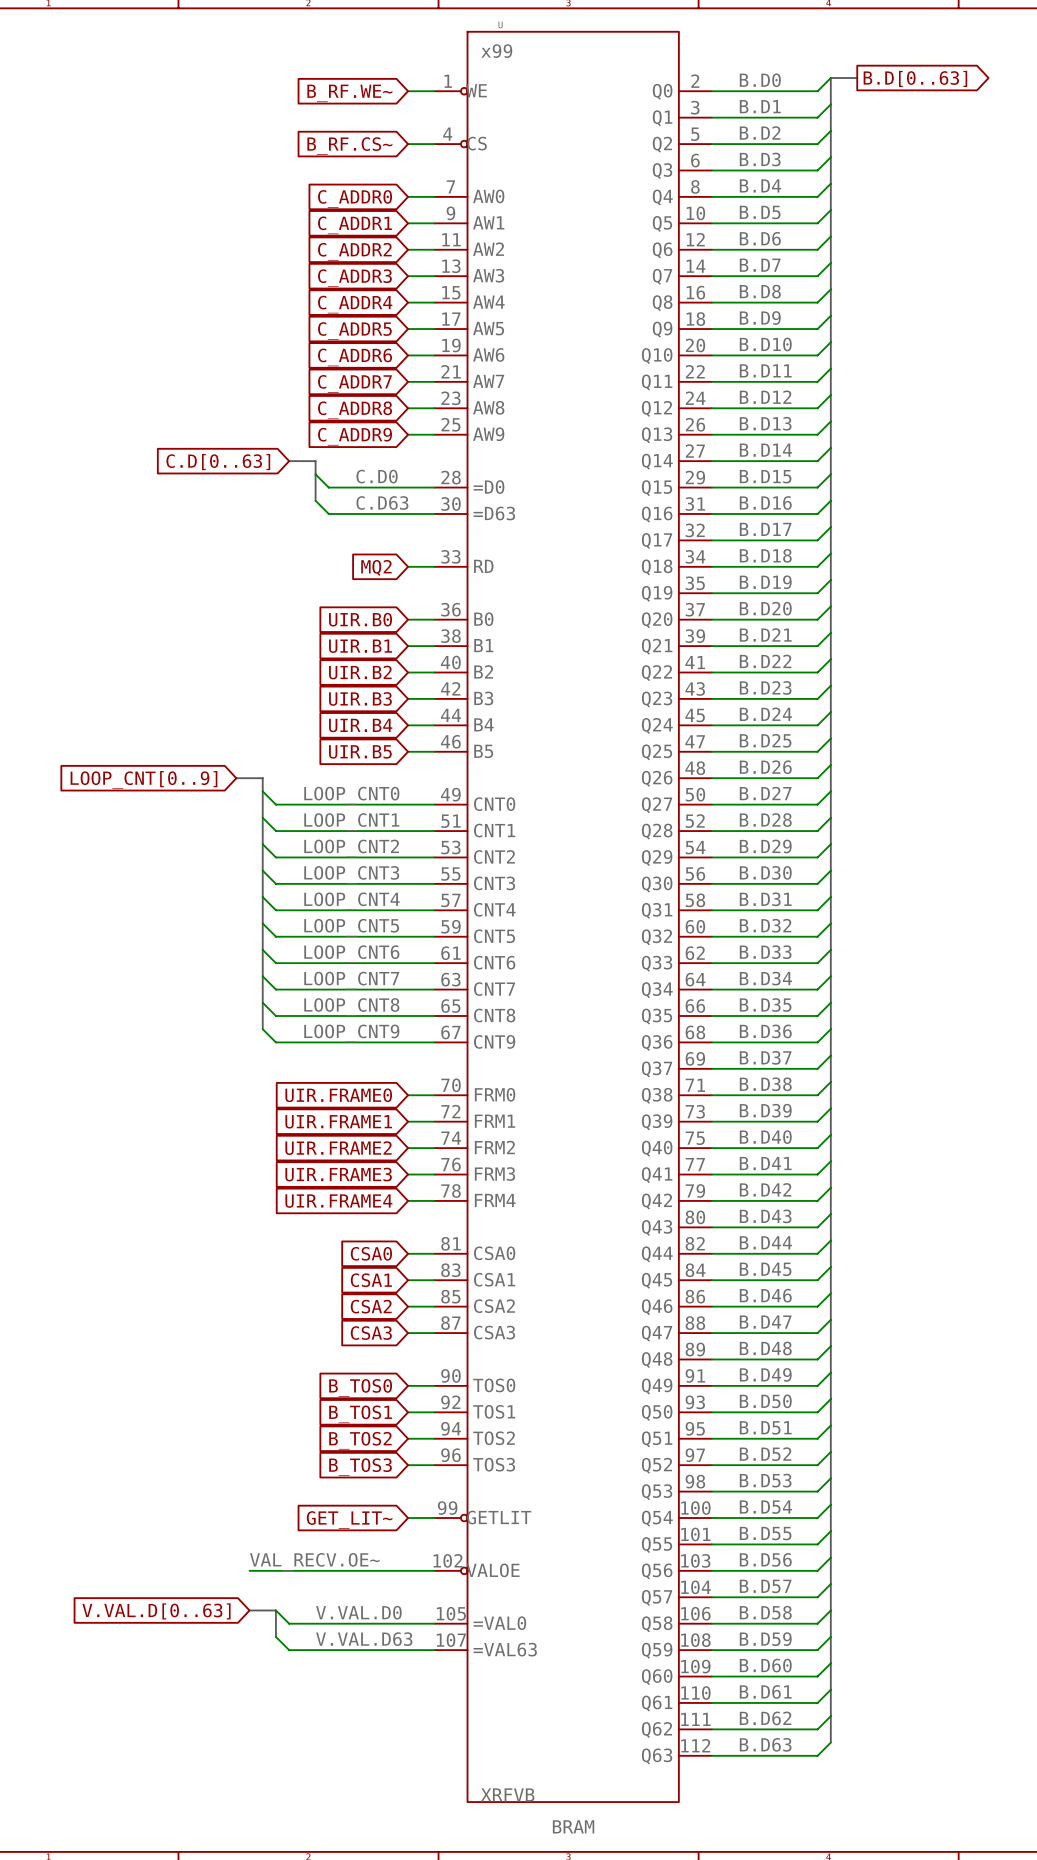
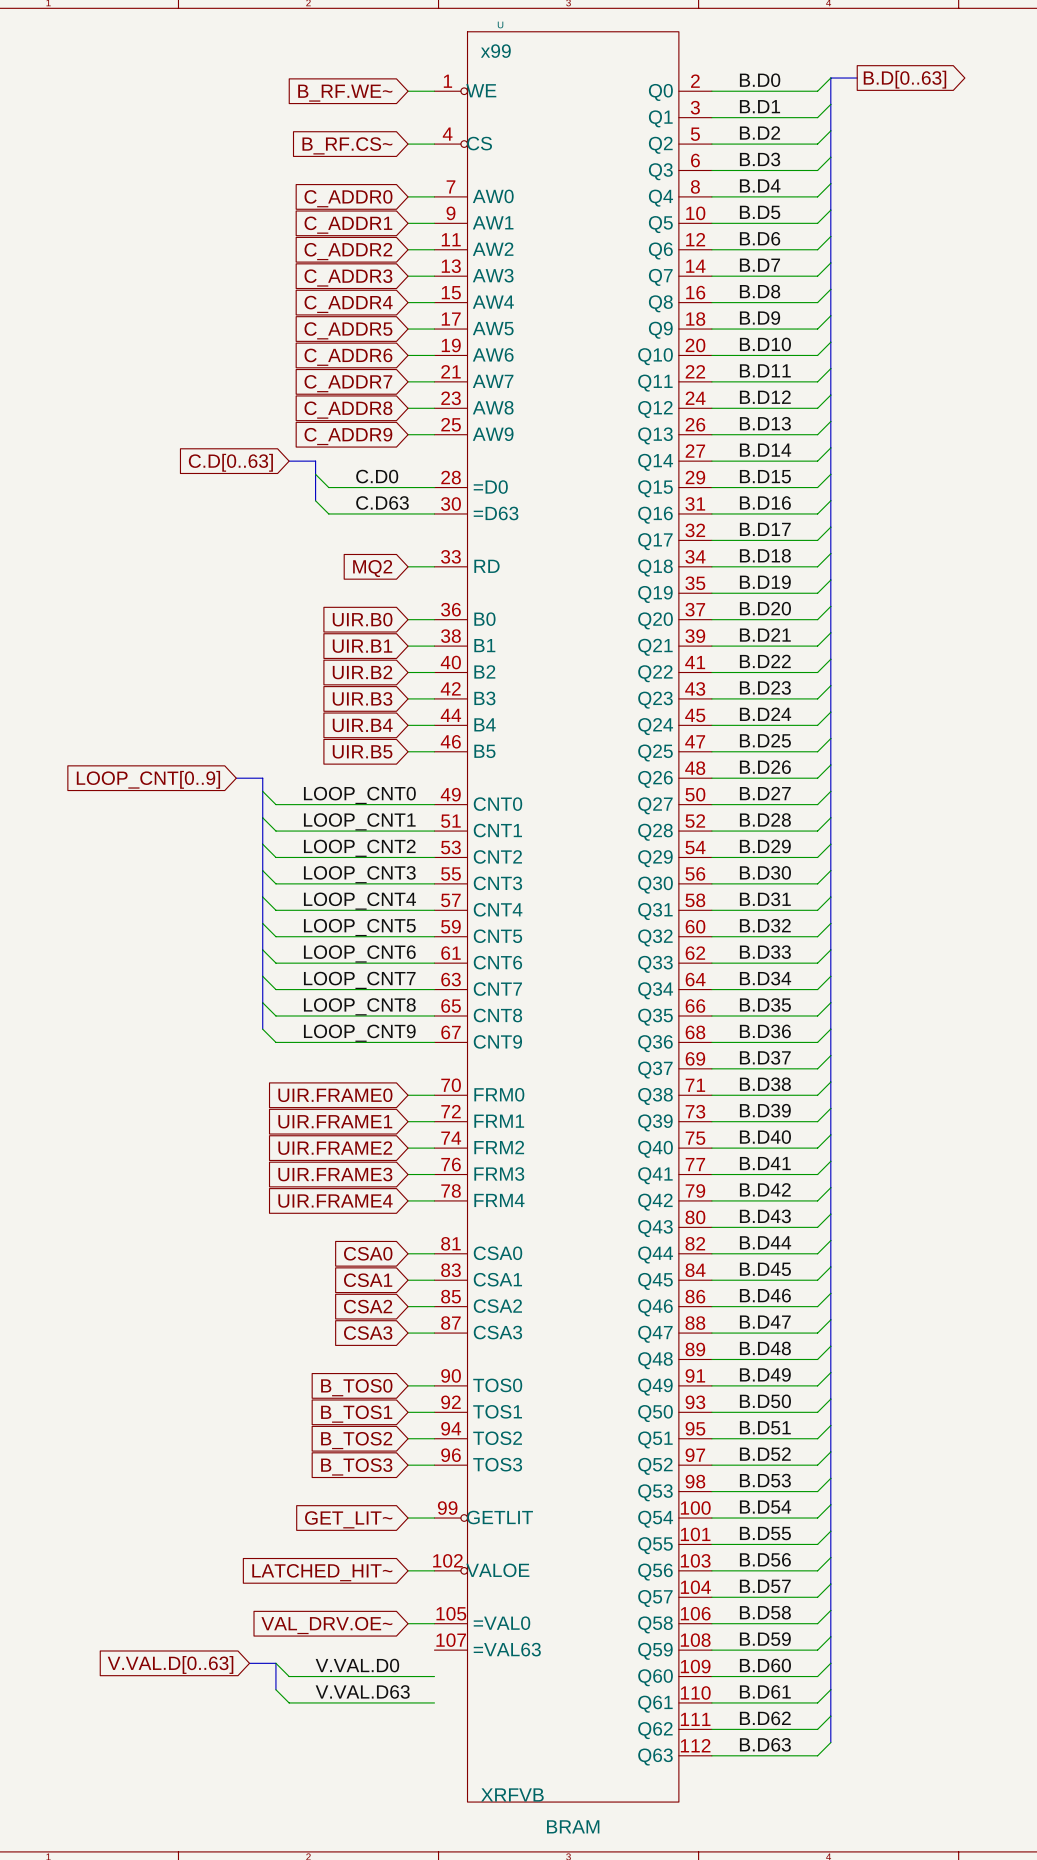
label: VAL_RECV.OE~ (314, 1561) -> none
wire: (249, 1570) (408, 1570) -> none
global label: none -> LATCHED_HIT~ (322, 1572)
bus: (249, 1610) (275, 1610) (275, 1636) -> (249, 1663) (275, 1663) (275, 1689)
wire: (275, 1610) (289, 1623) (408, 1623) -> none
global label position: V.VAL.D[0..63] (156, 1611) -> V.VAL.D[0..63] (170, 1664)
label position: V.VAL.D0 (358, 1612) -> V.VAL.D0 (357, 1665)
global label: none -> VAL_DRV.OE~ (326, 1625)
wire: (275, 1636) (289, 1650) (434, 1650) -> (275, 1663) (289, 1676) (434, 1676)
label position: V.VAL.D63 (364, 1639) -> V.VAL.D63 (362, 1691)
wire: none -> (275, 1689) (289, 1702) (434, 1702)

